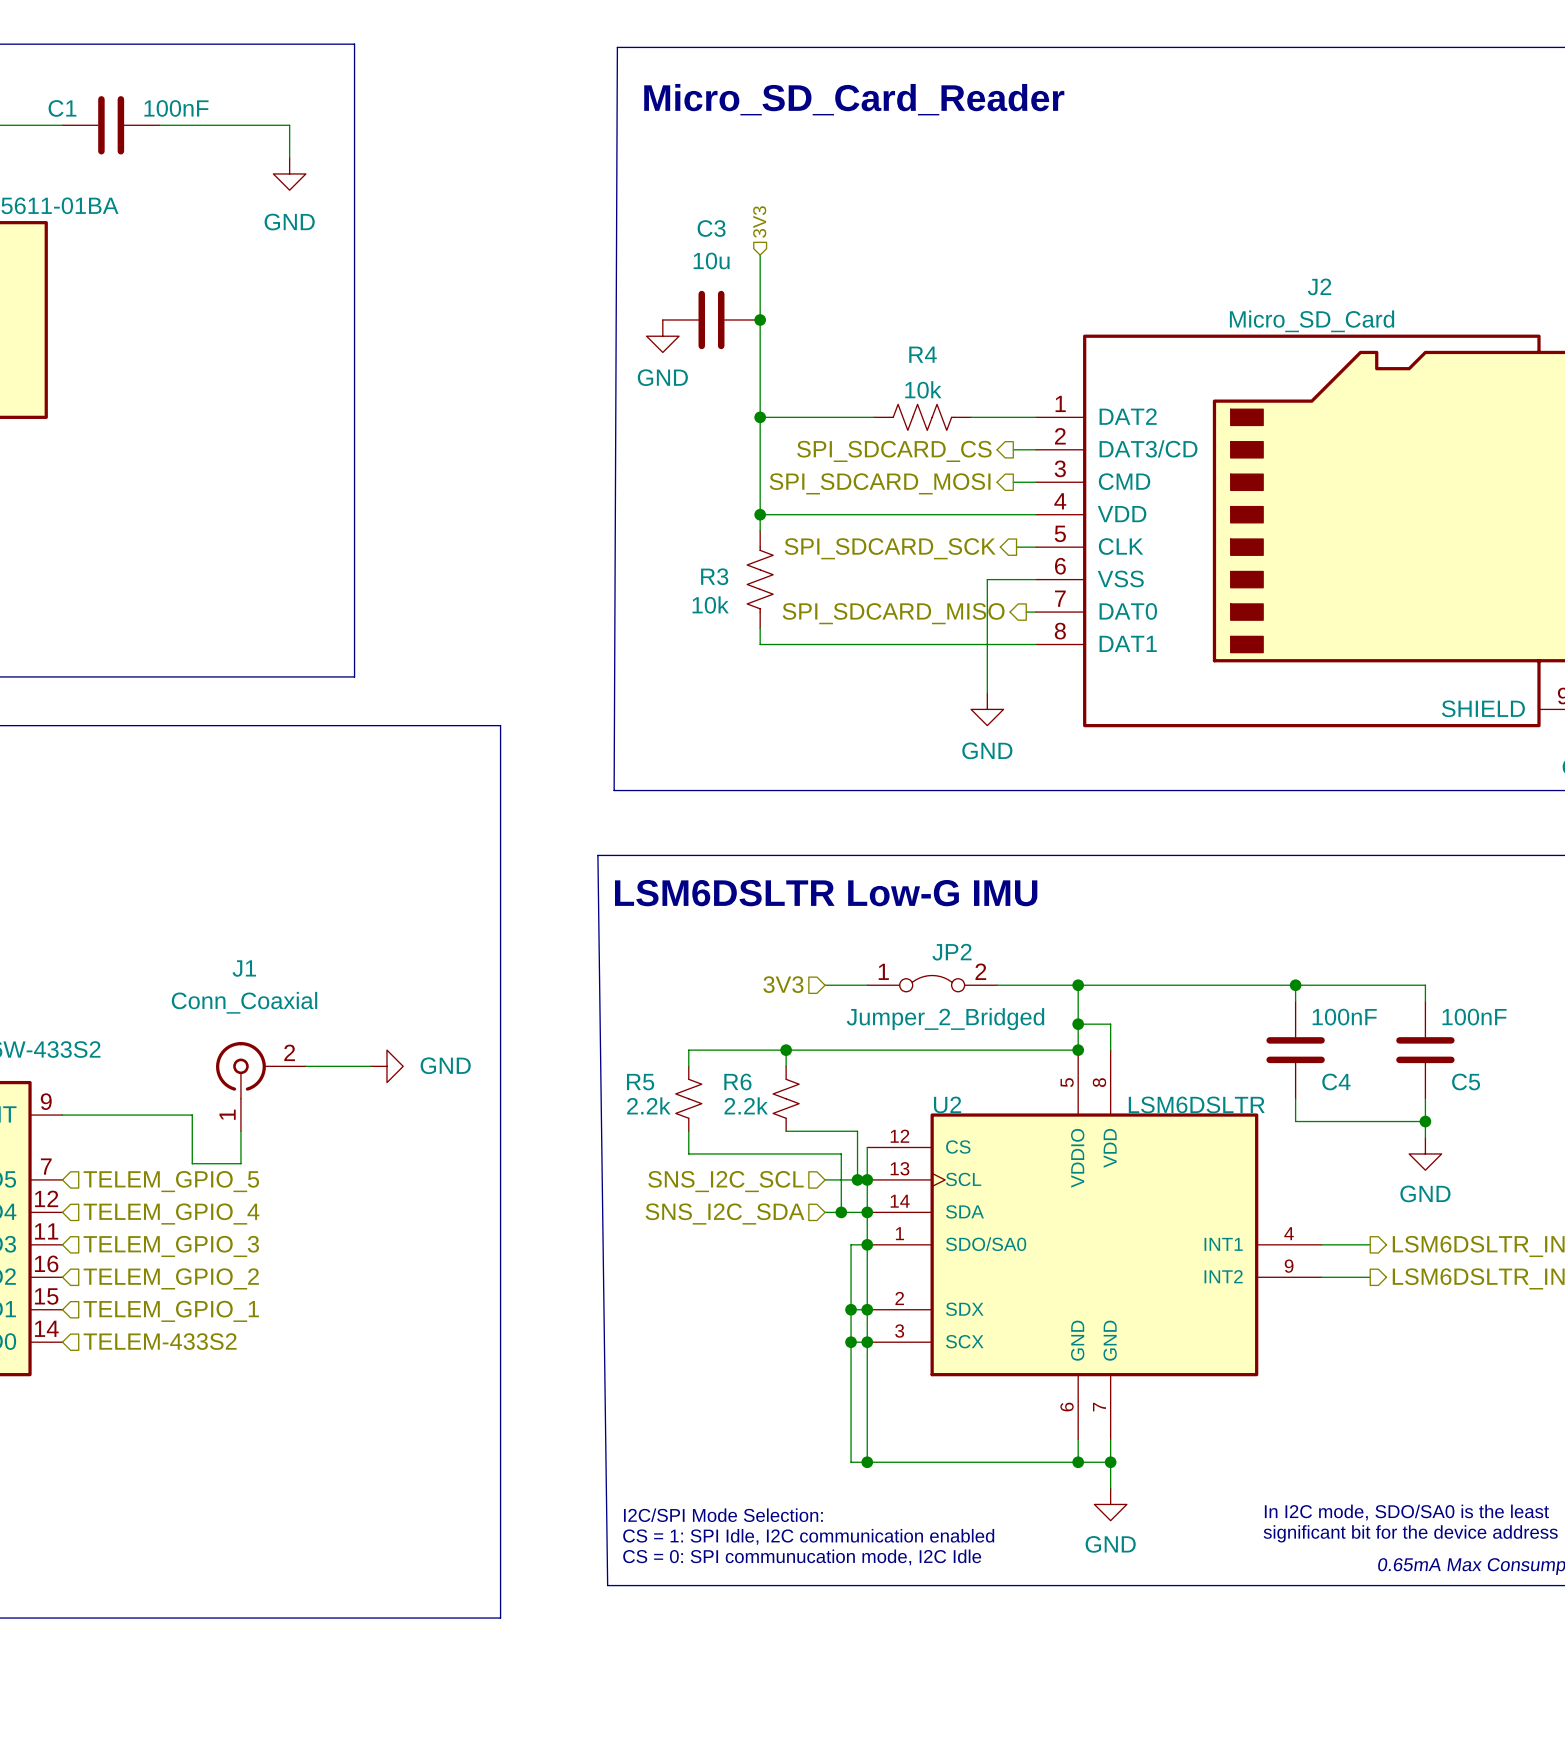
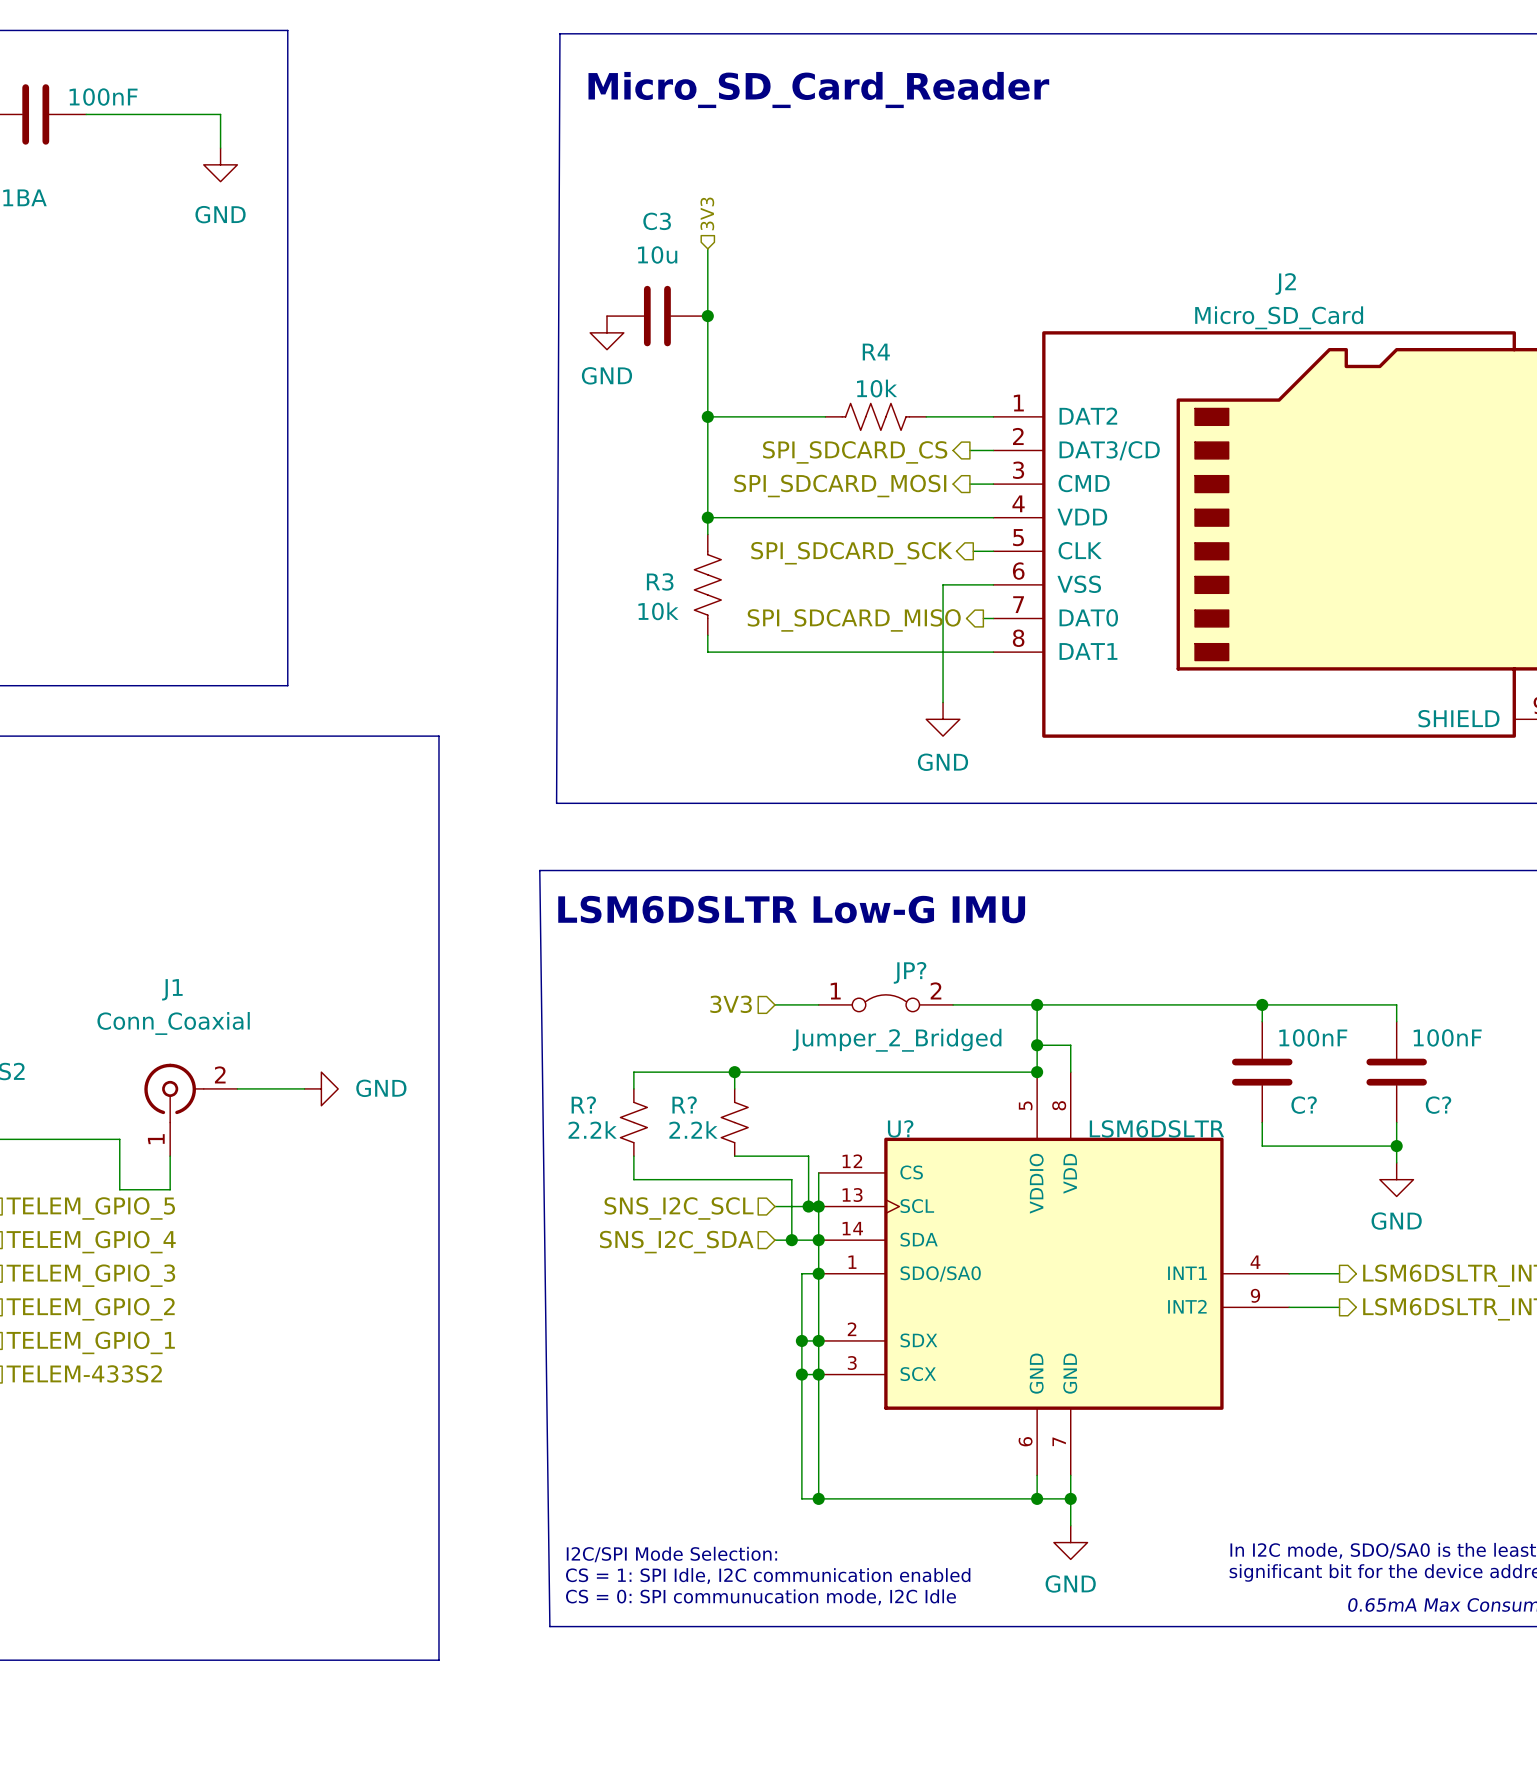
JP2 name: JP2 (951, 952) -> JP? (910, 972)
R6 name: R6 (737, 1081) -> R? (684, 1104)
C4 name: C4 (1336, 1081) -> C? (1304, 1105)
C5 name: C5 (1466, 1081) -> C? (1438, 1105)
R5 name: R5 (640, 1082) -> R? (583, 1104)
U2 name: U2 (947, 1104) -> U? (900, 1128)

